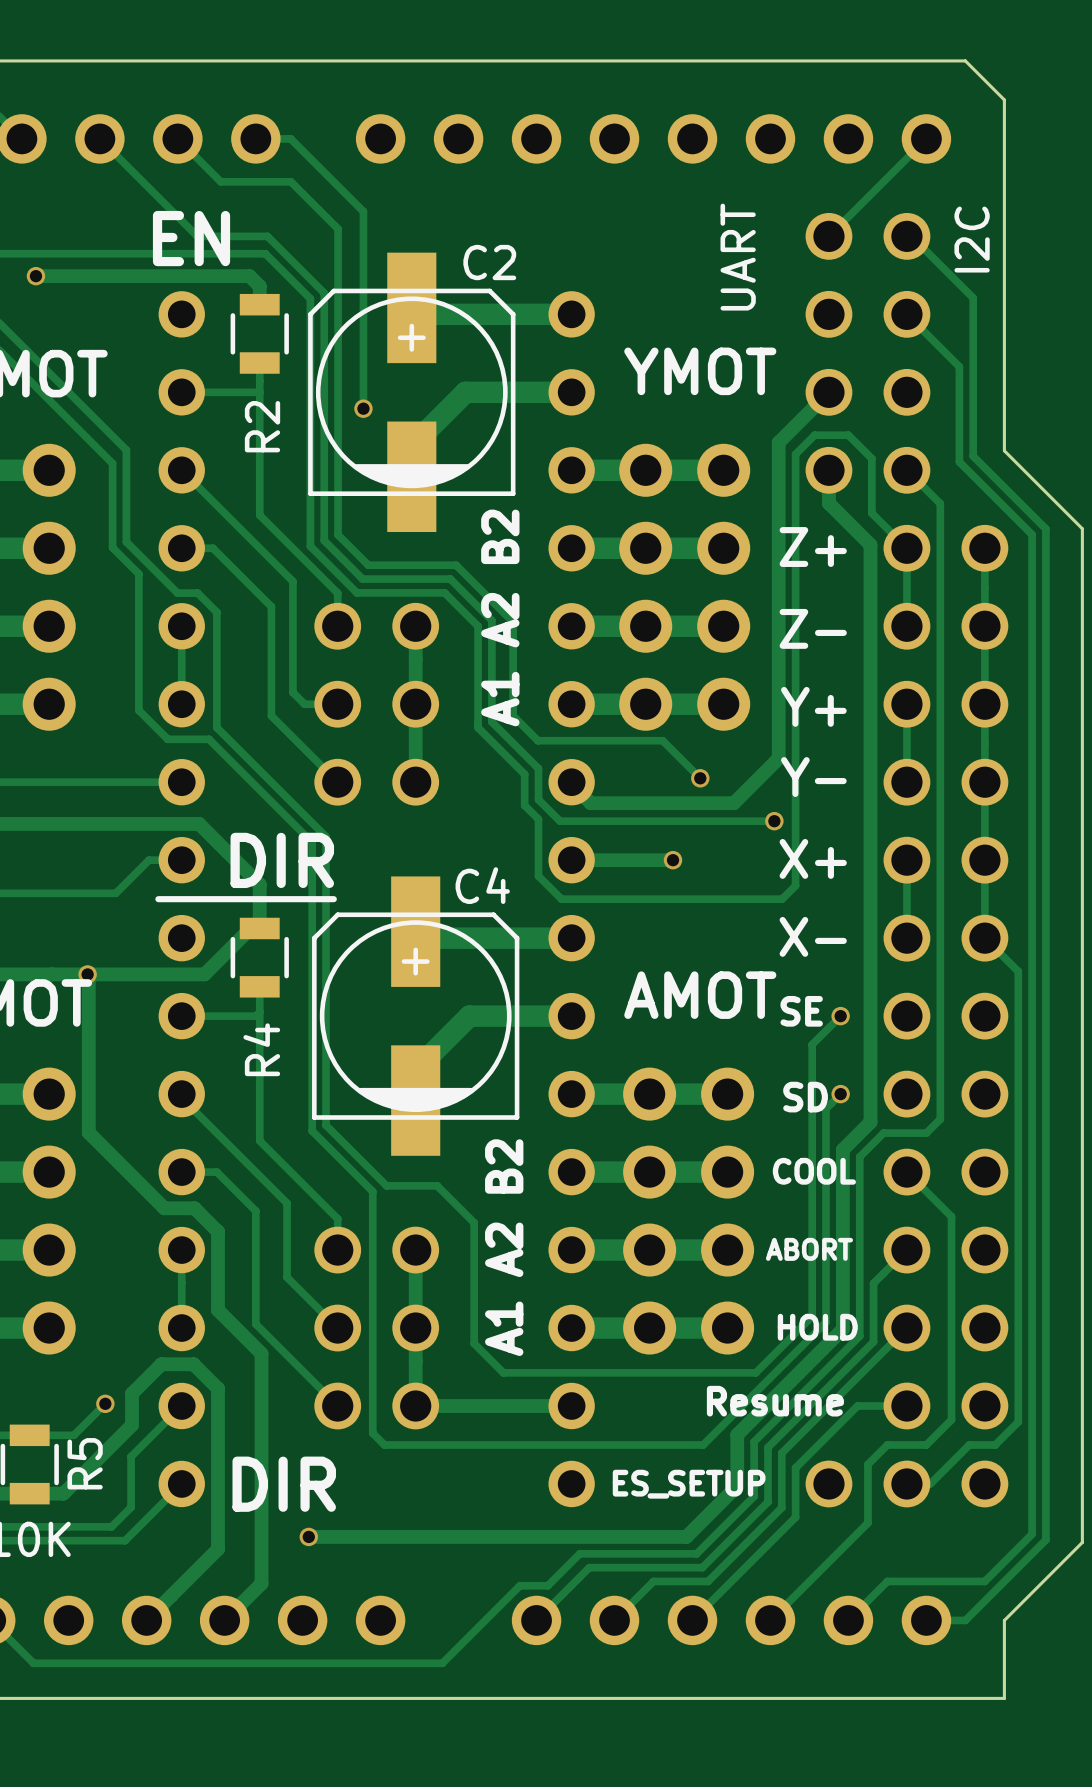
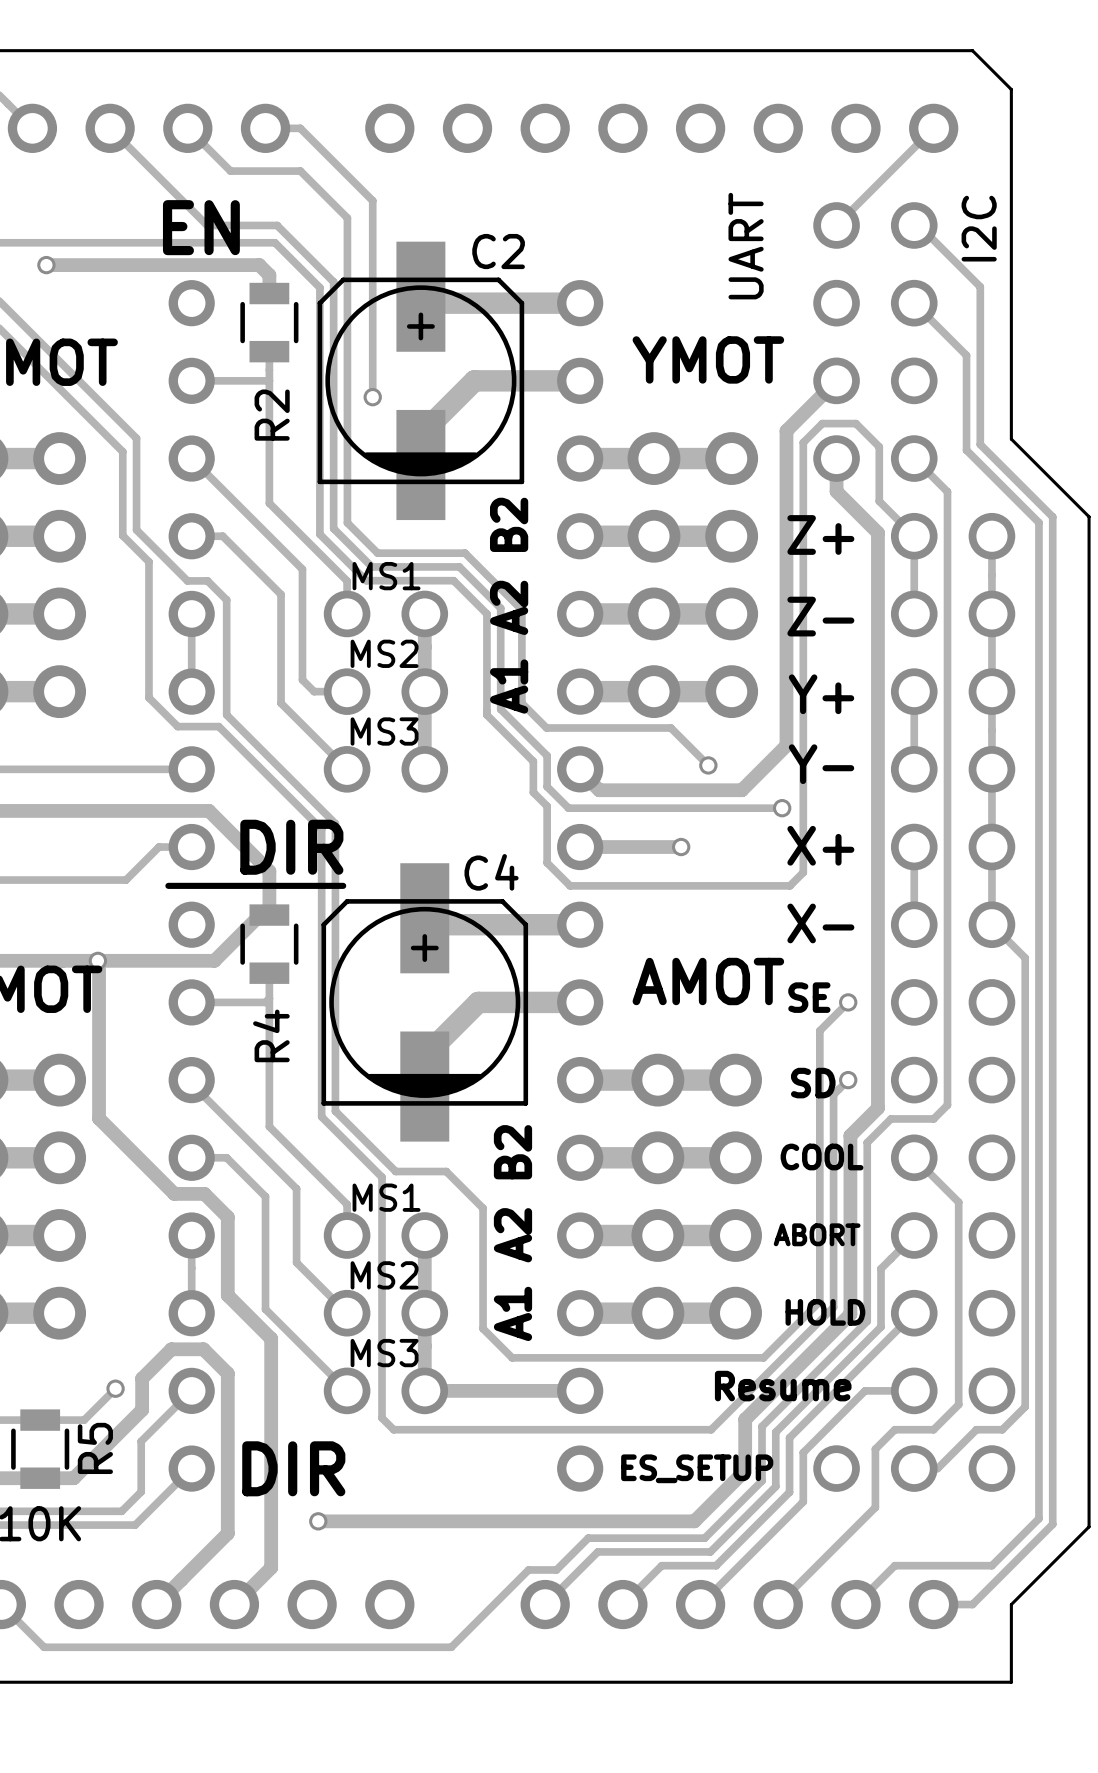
text: none -> MS1 (386, 576)
text: none -> MS2 (384, 653)
text: none -> MS3 (384, 731)
text: none -> MS1 (386, 1197)
text: none -> MS2 (384, 1275)
text: none -> MS3 (384, 1353)

